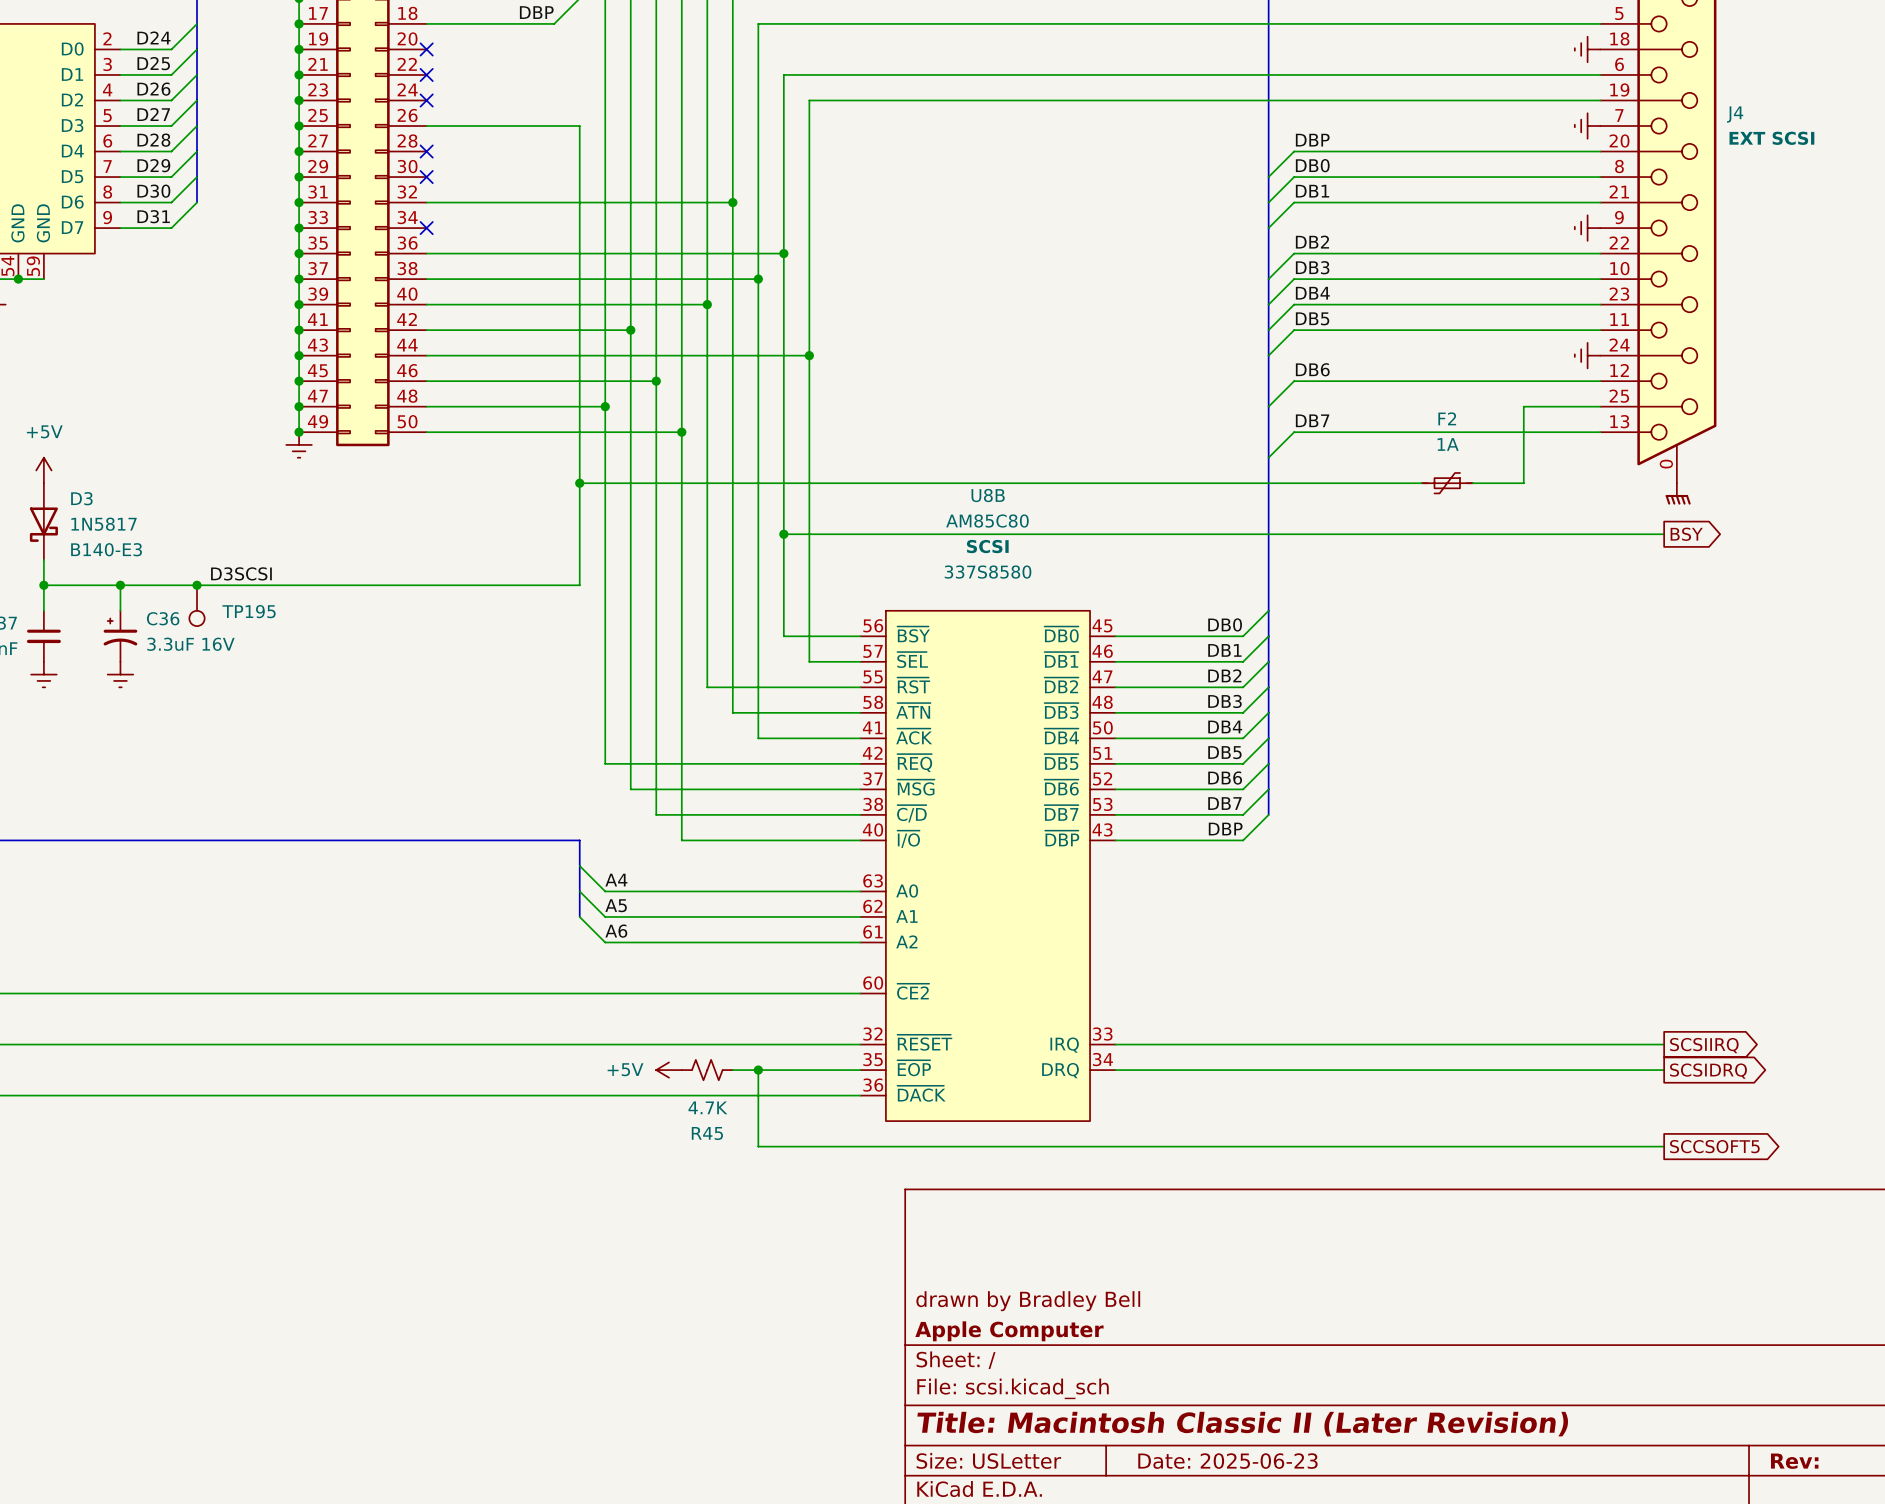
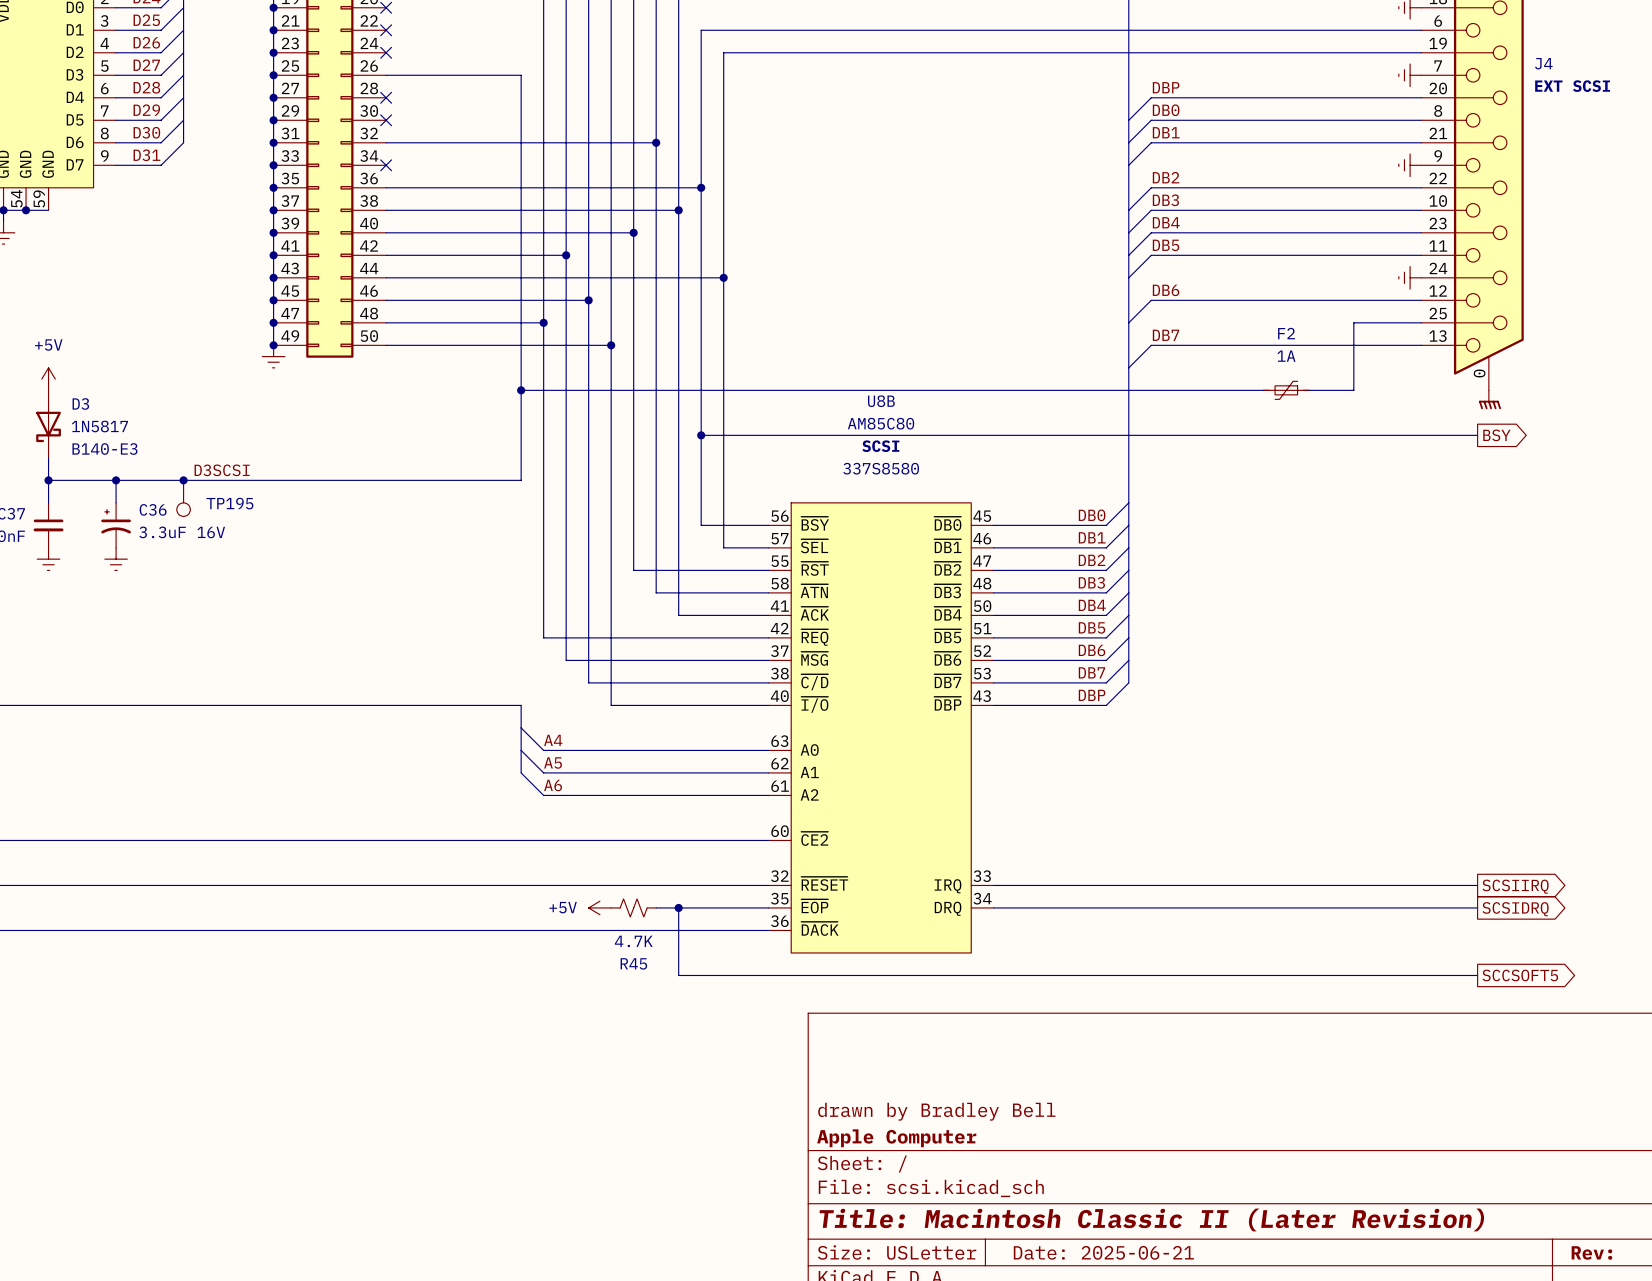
title block: Date: 2025-06-23 (1227, 1461) -> Date: 2025-06-21 (1103, 1252)

